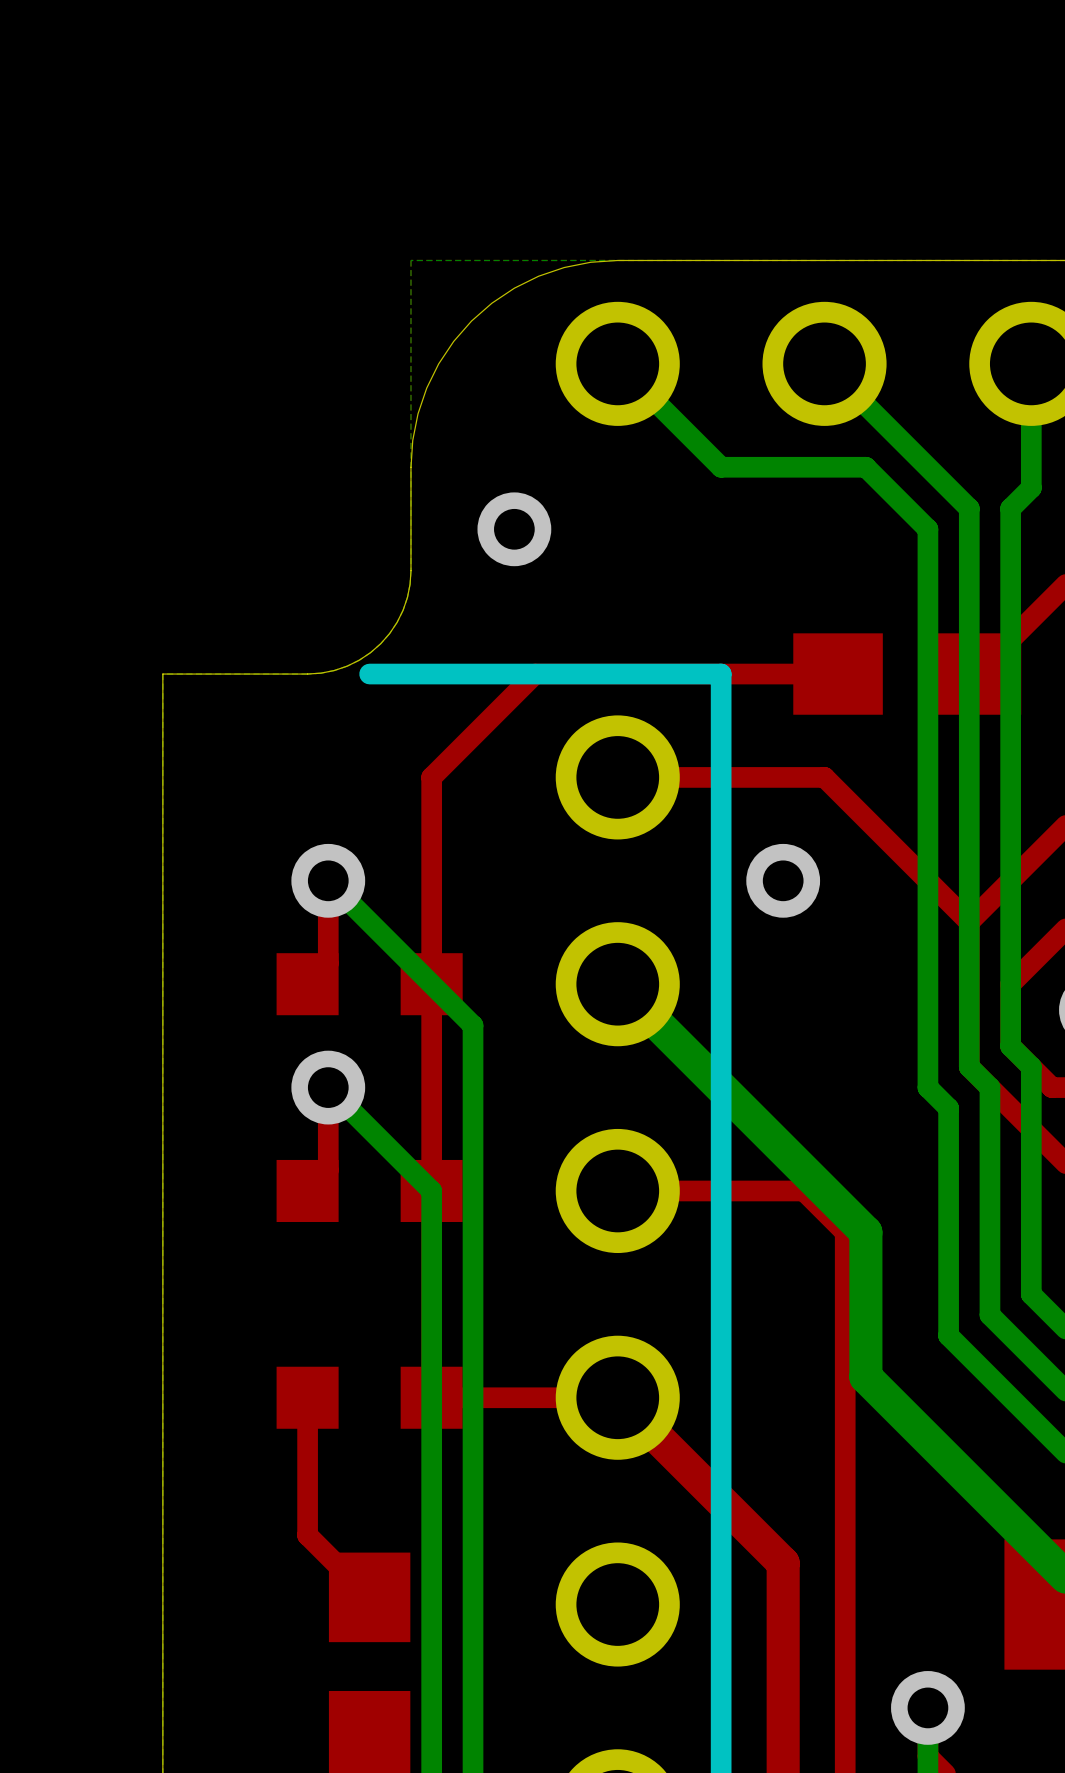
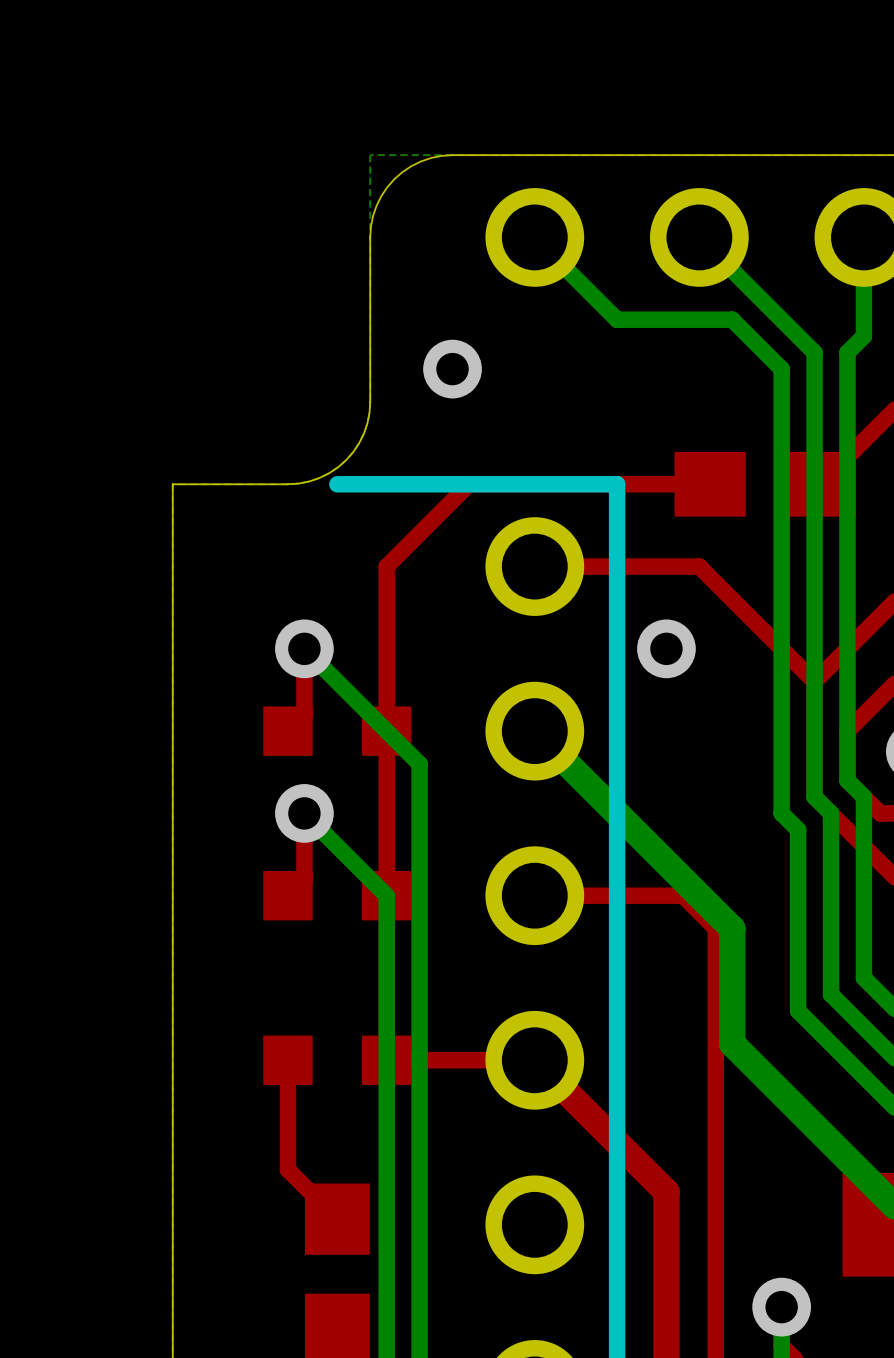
board edge: (617, 260) (590, 262) (564, 267) (538, 276) (514, 288) (491, 303) (471, 321) (453, 341) (438, 363) (426, 388) (418, 413) (412, 440) (410, 467) -> (534, 155) (441, 155) (411, 166) (394, 179) (381, 196) (370, 226) (370, 319)

